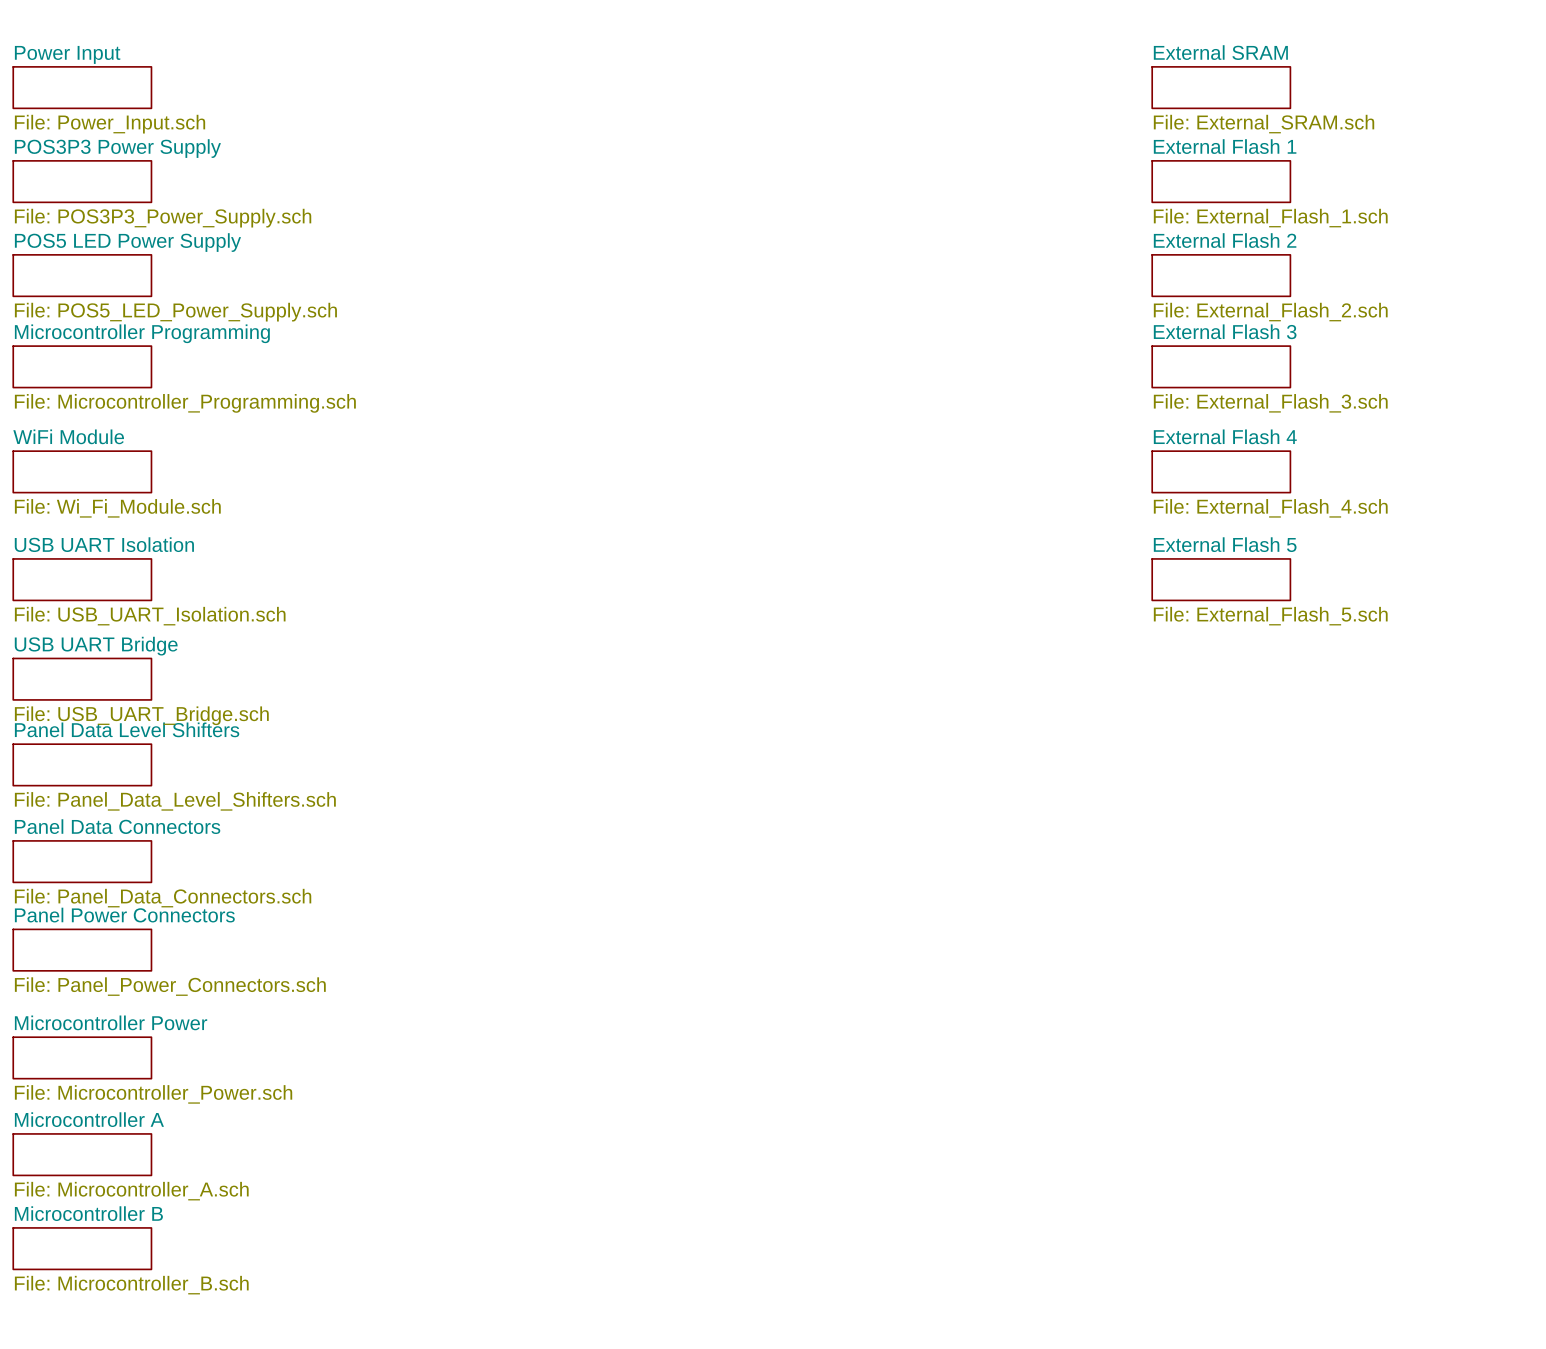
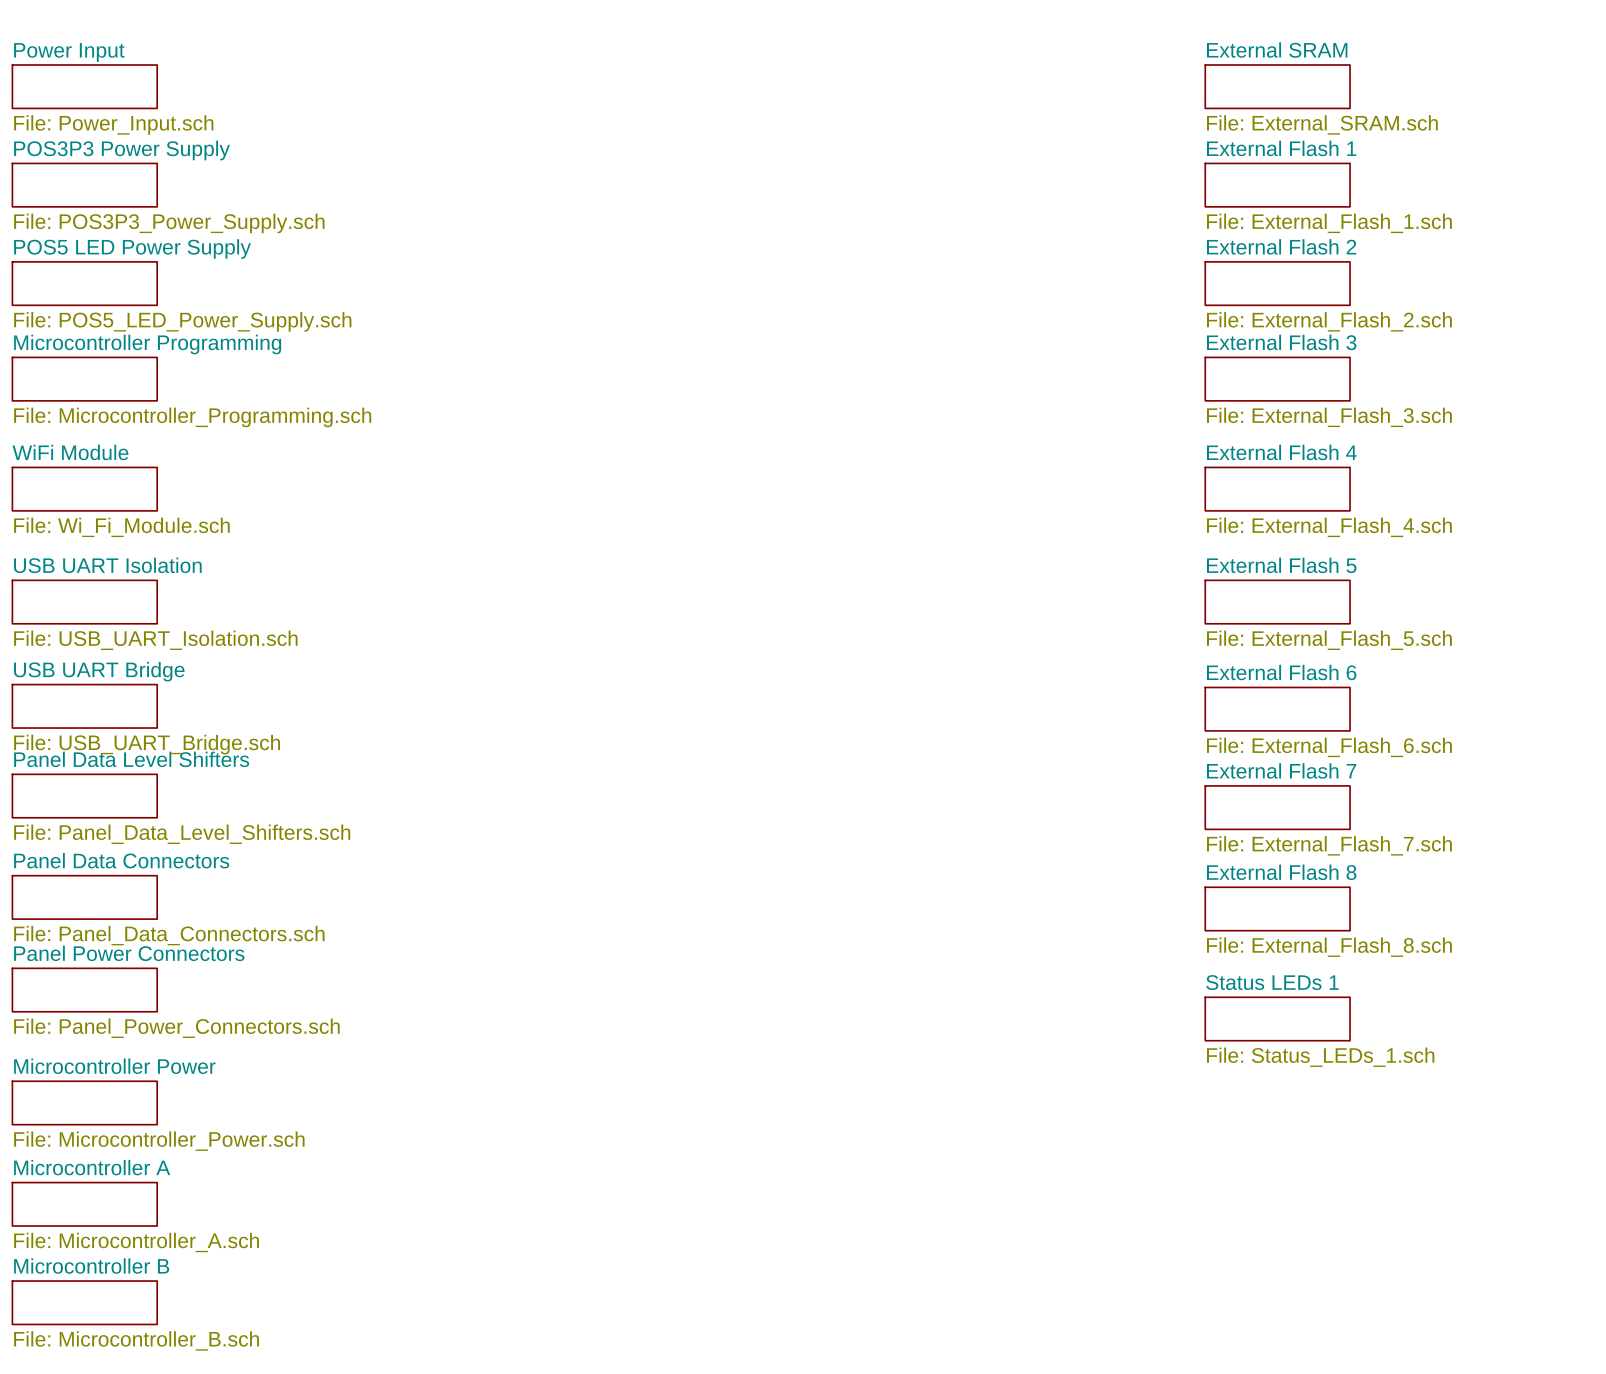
sheet External Flash 6: none -> File: External_Flash_6.sch (1277, 709)
sheet External Flash 7: none -> File: External_Flash_7.sch (1277, 807)
sheet External Flash 8: none -> File: External_Flash_8.sch (1277, 908)
sheet Status LEDs 1: none -> File: Status_LEDs_1.sch (1277, 1019)

